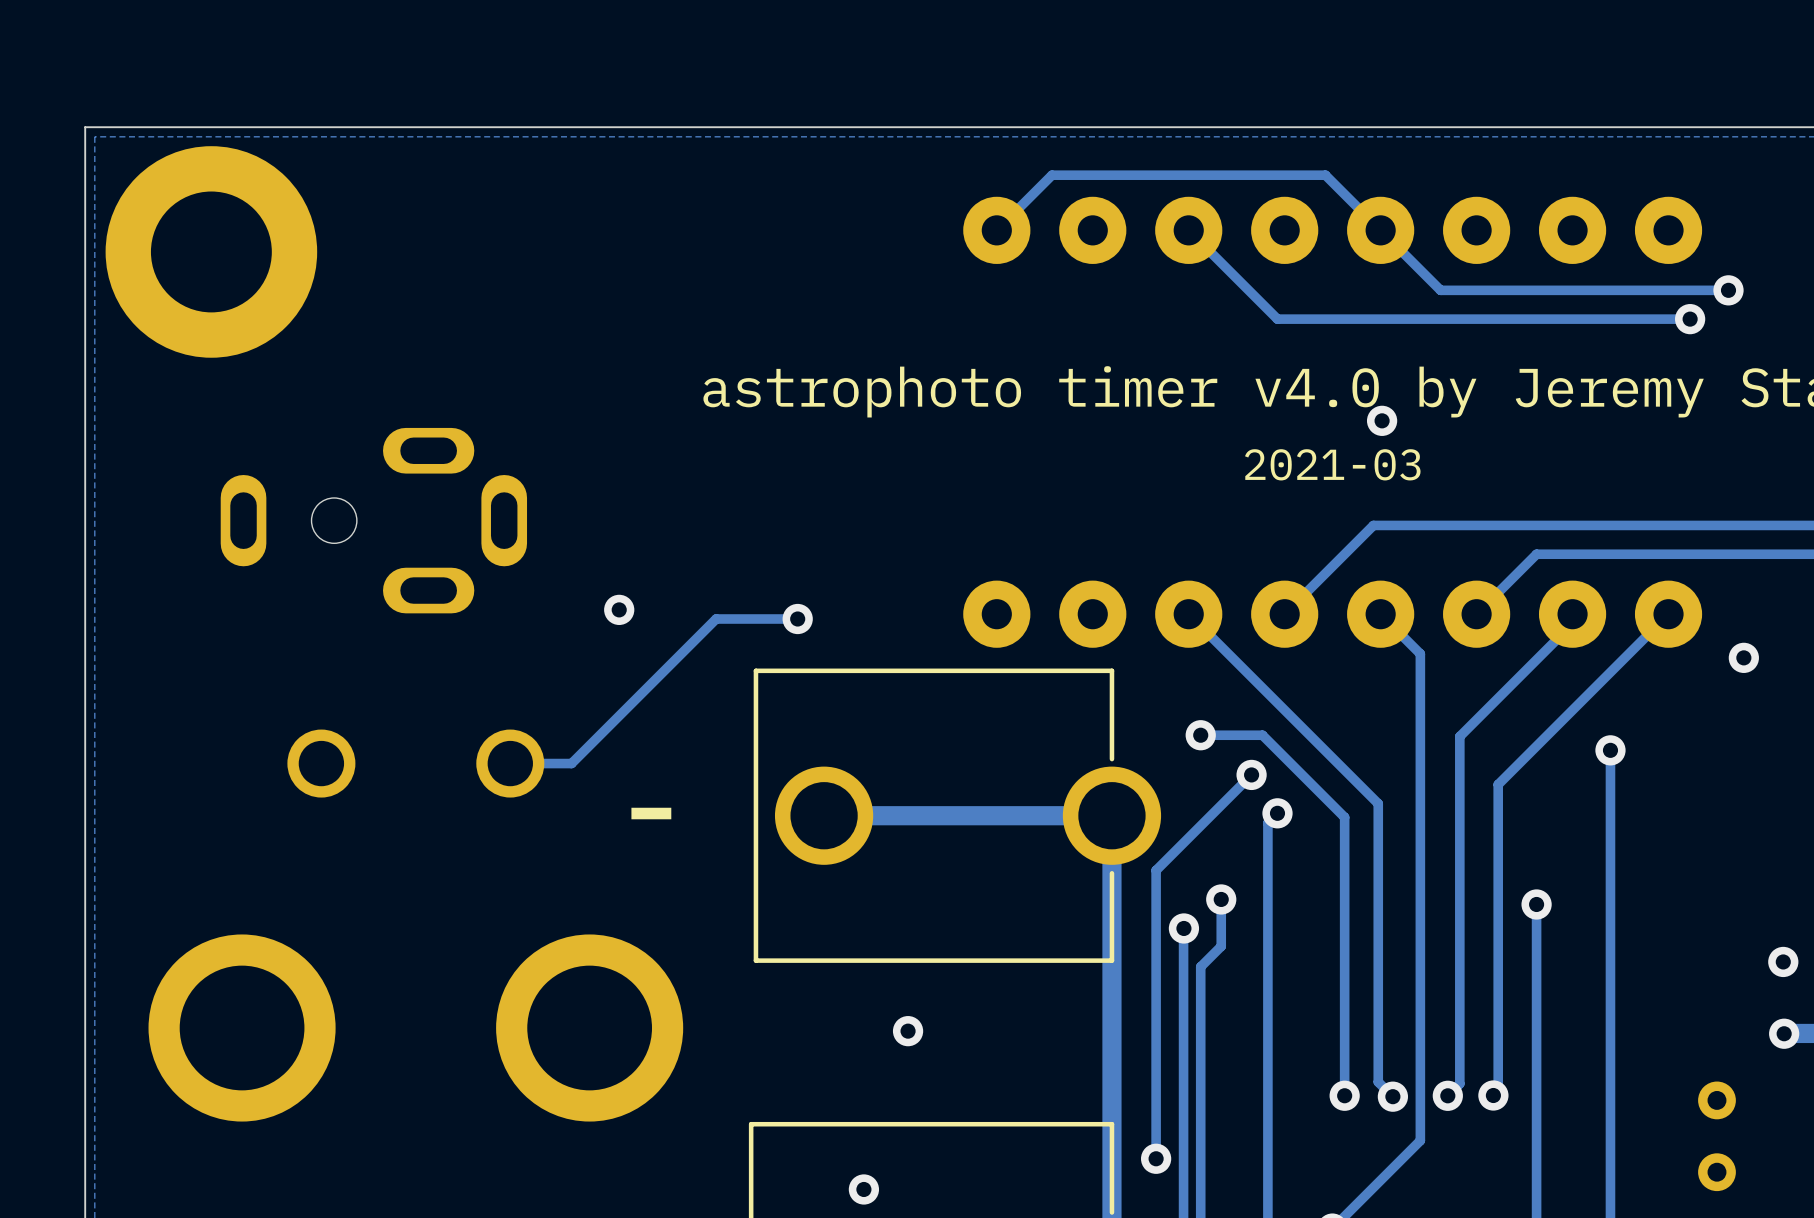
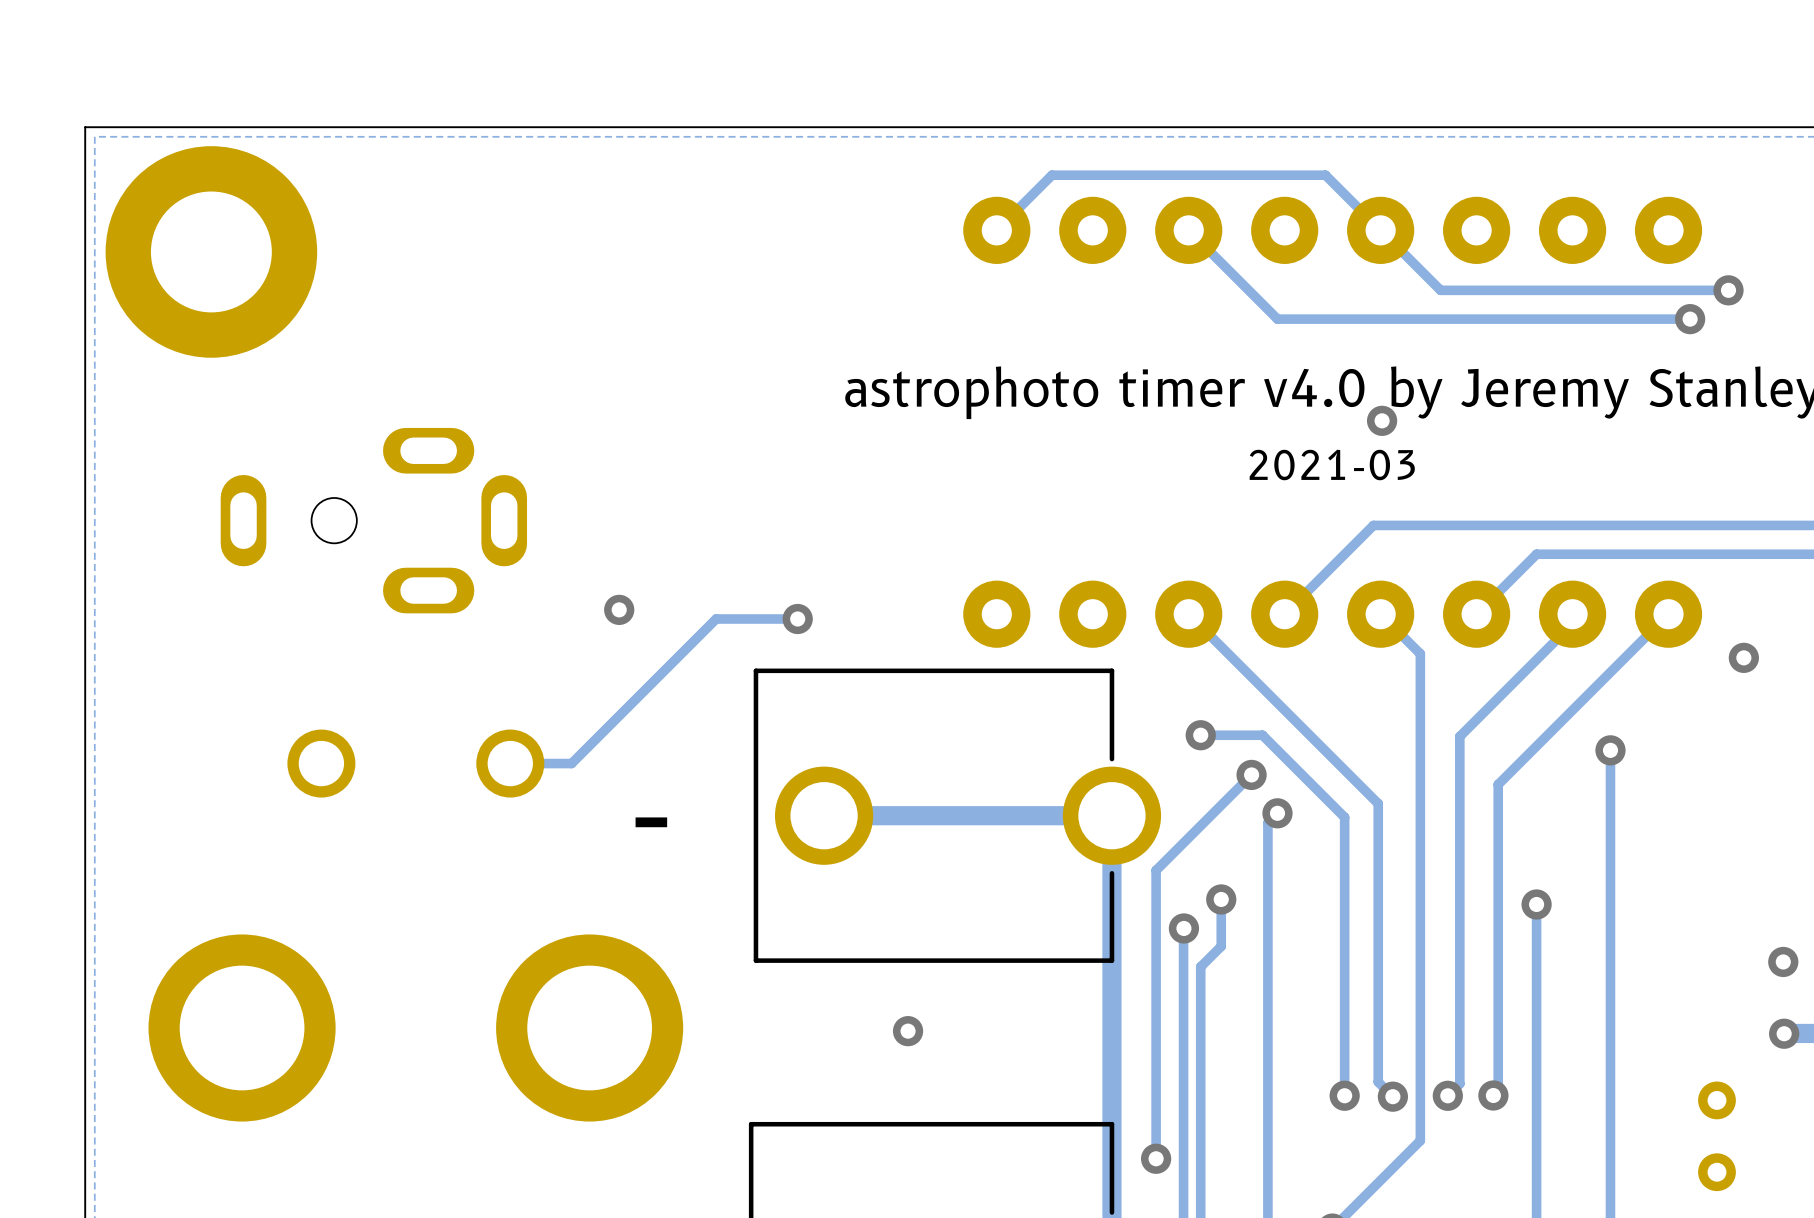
via: (863, 1189) -> none

